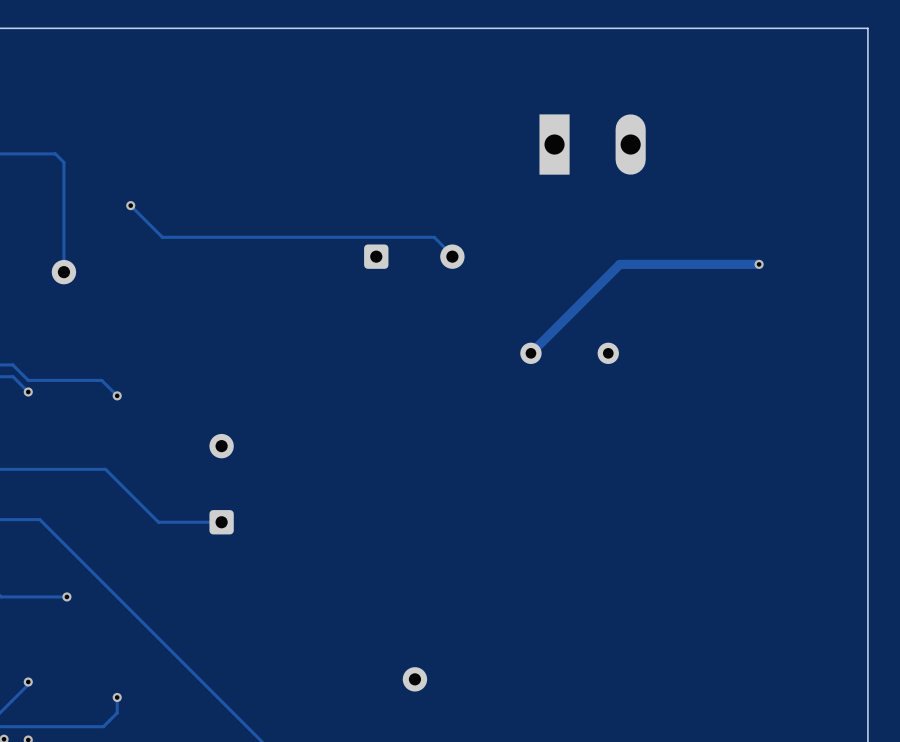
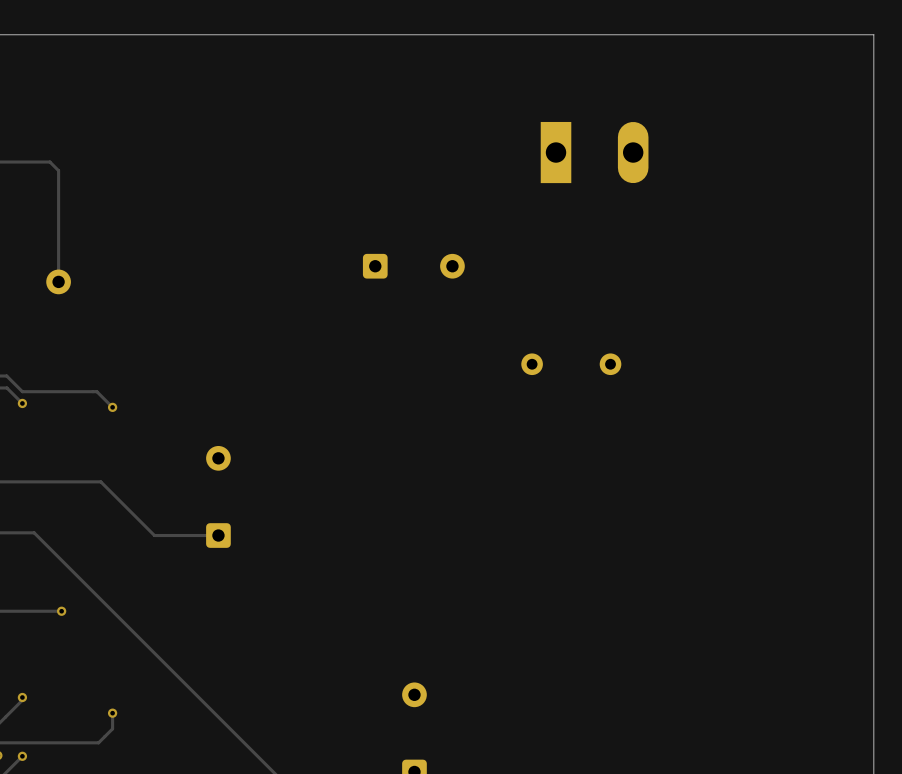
track: (130, 205) (162, 237) (434, 237) (452, 255) -> none
via: (130, 205) -> none
track: (759, 264) (619, 264) (530, 353) -> none
via: (759, 264) -> none

